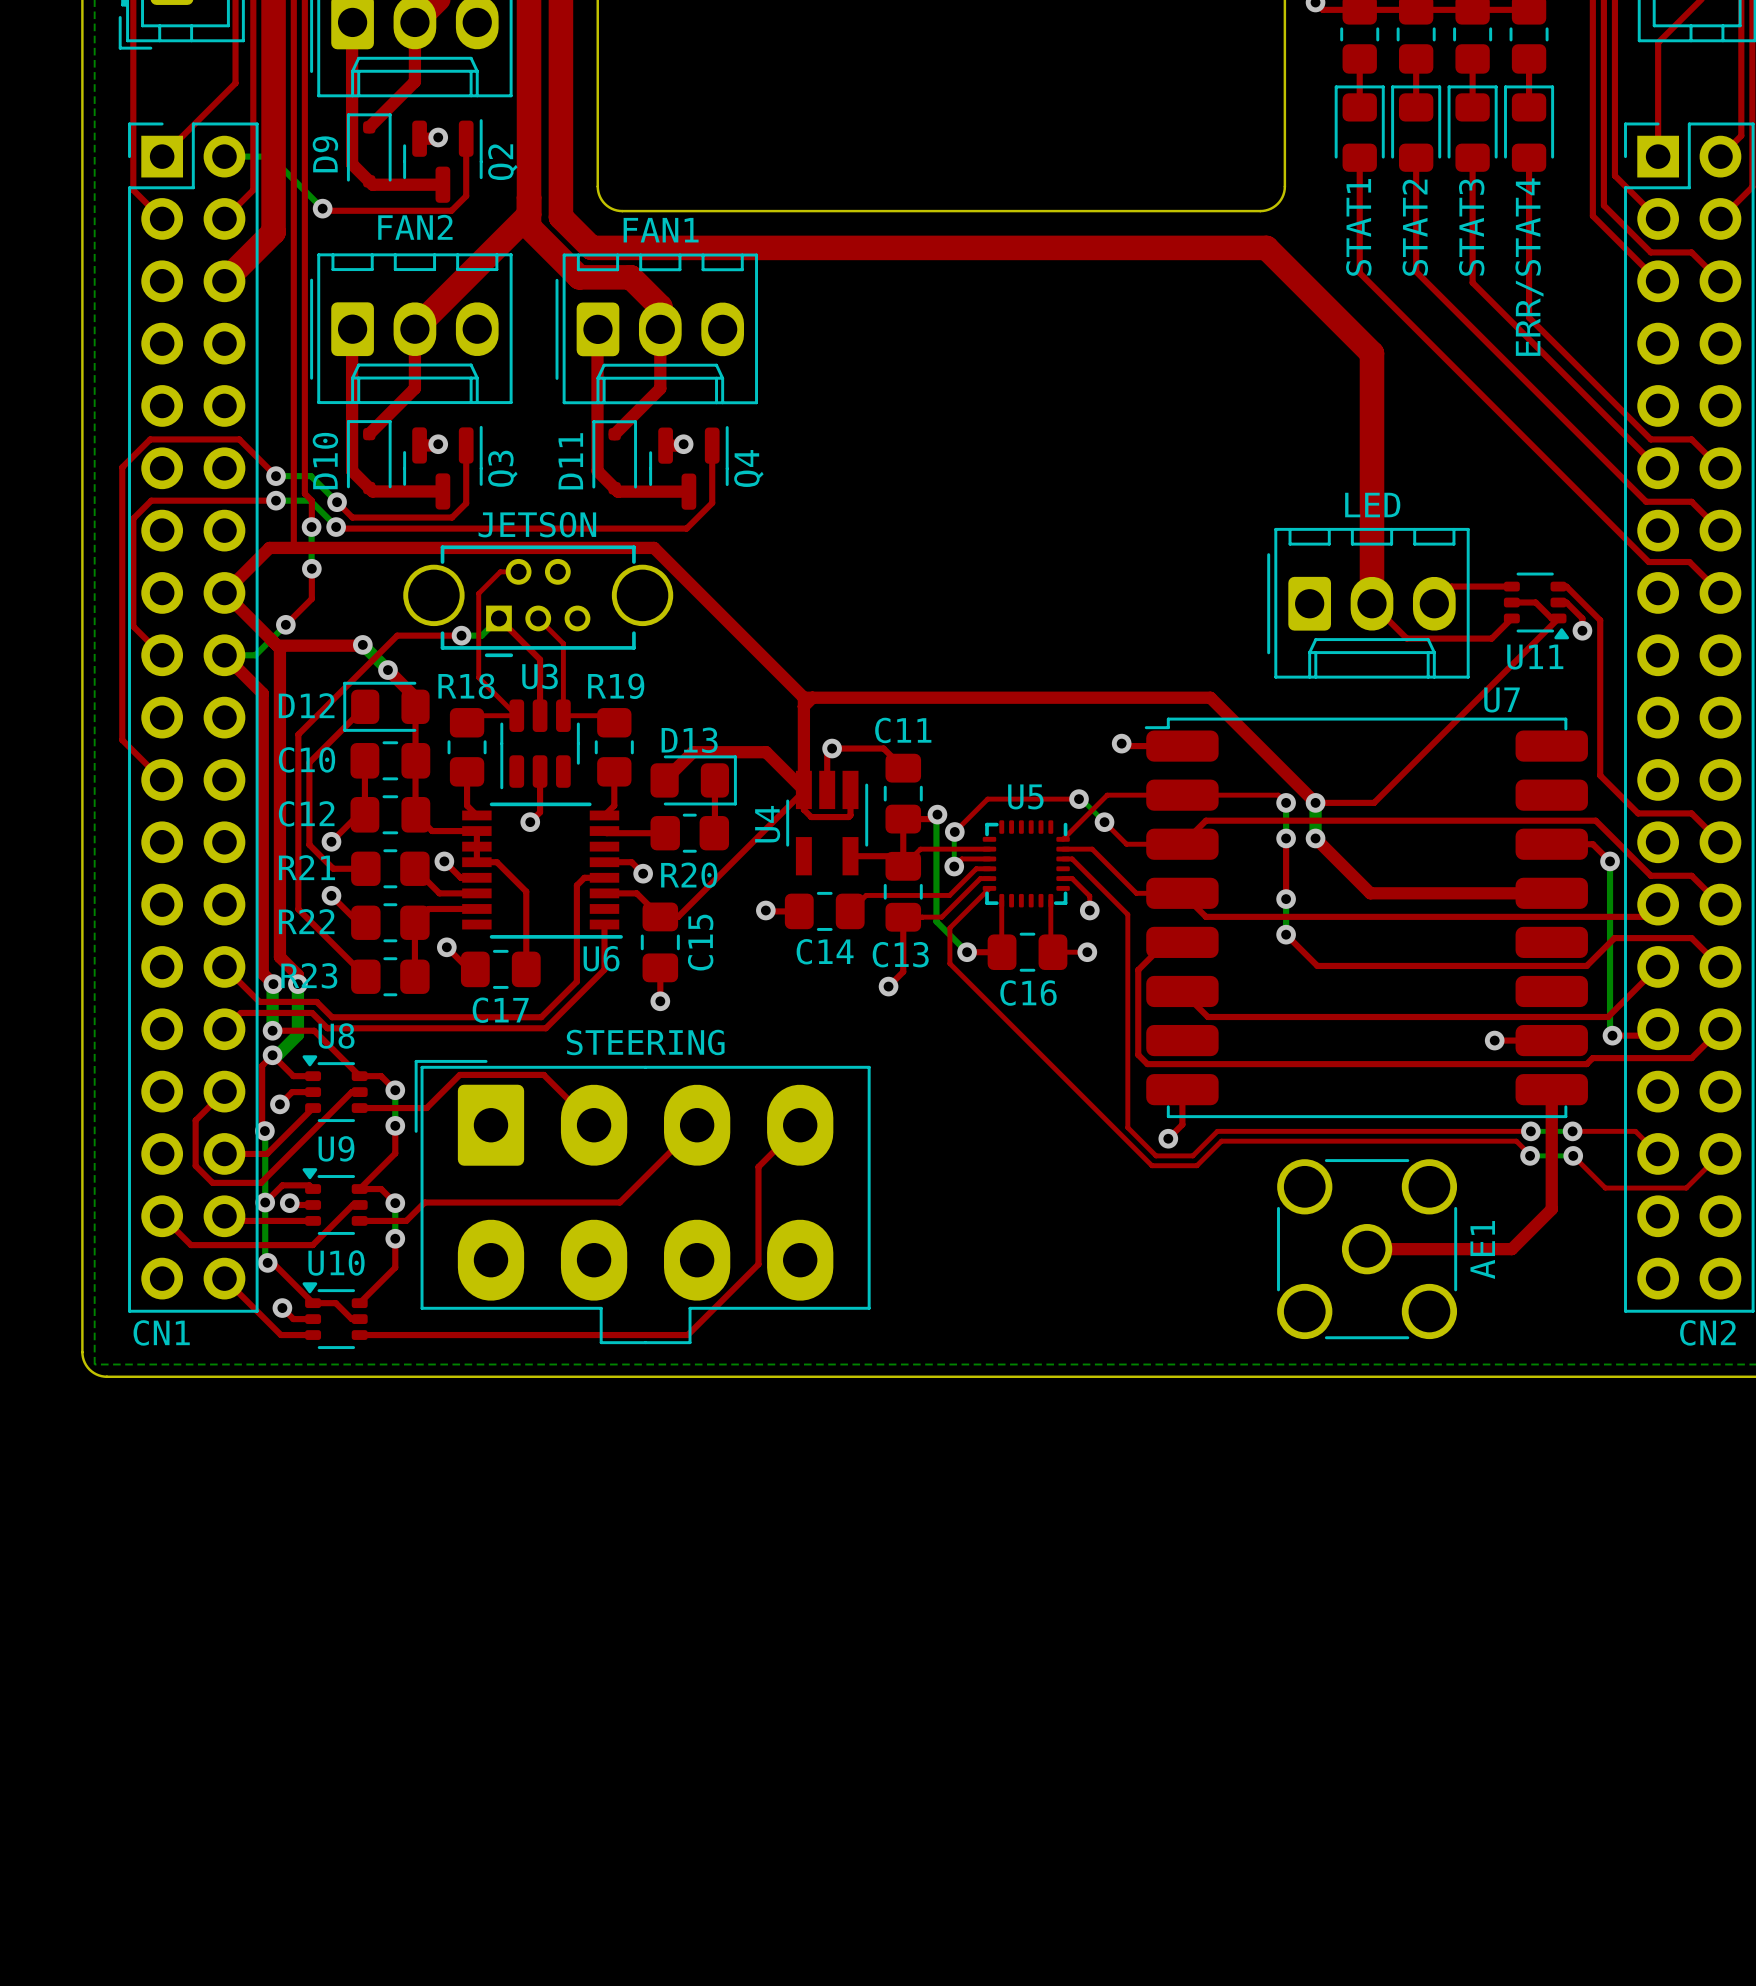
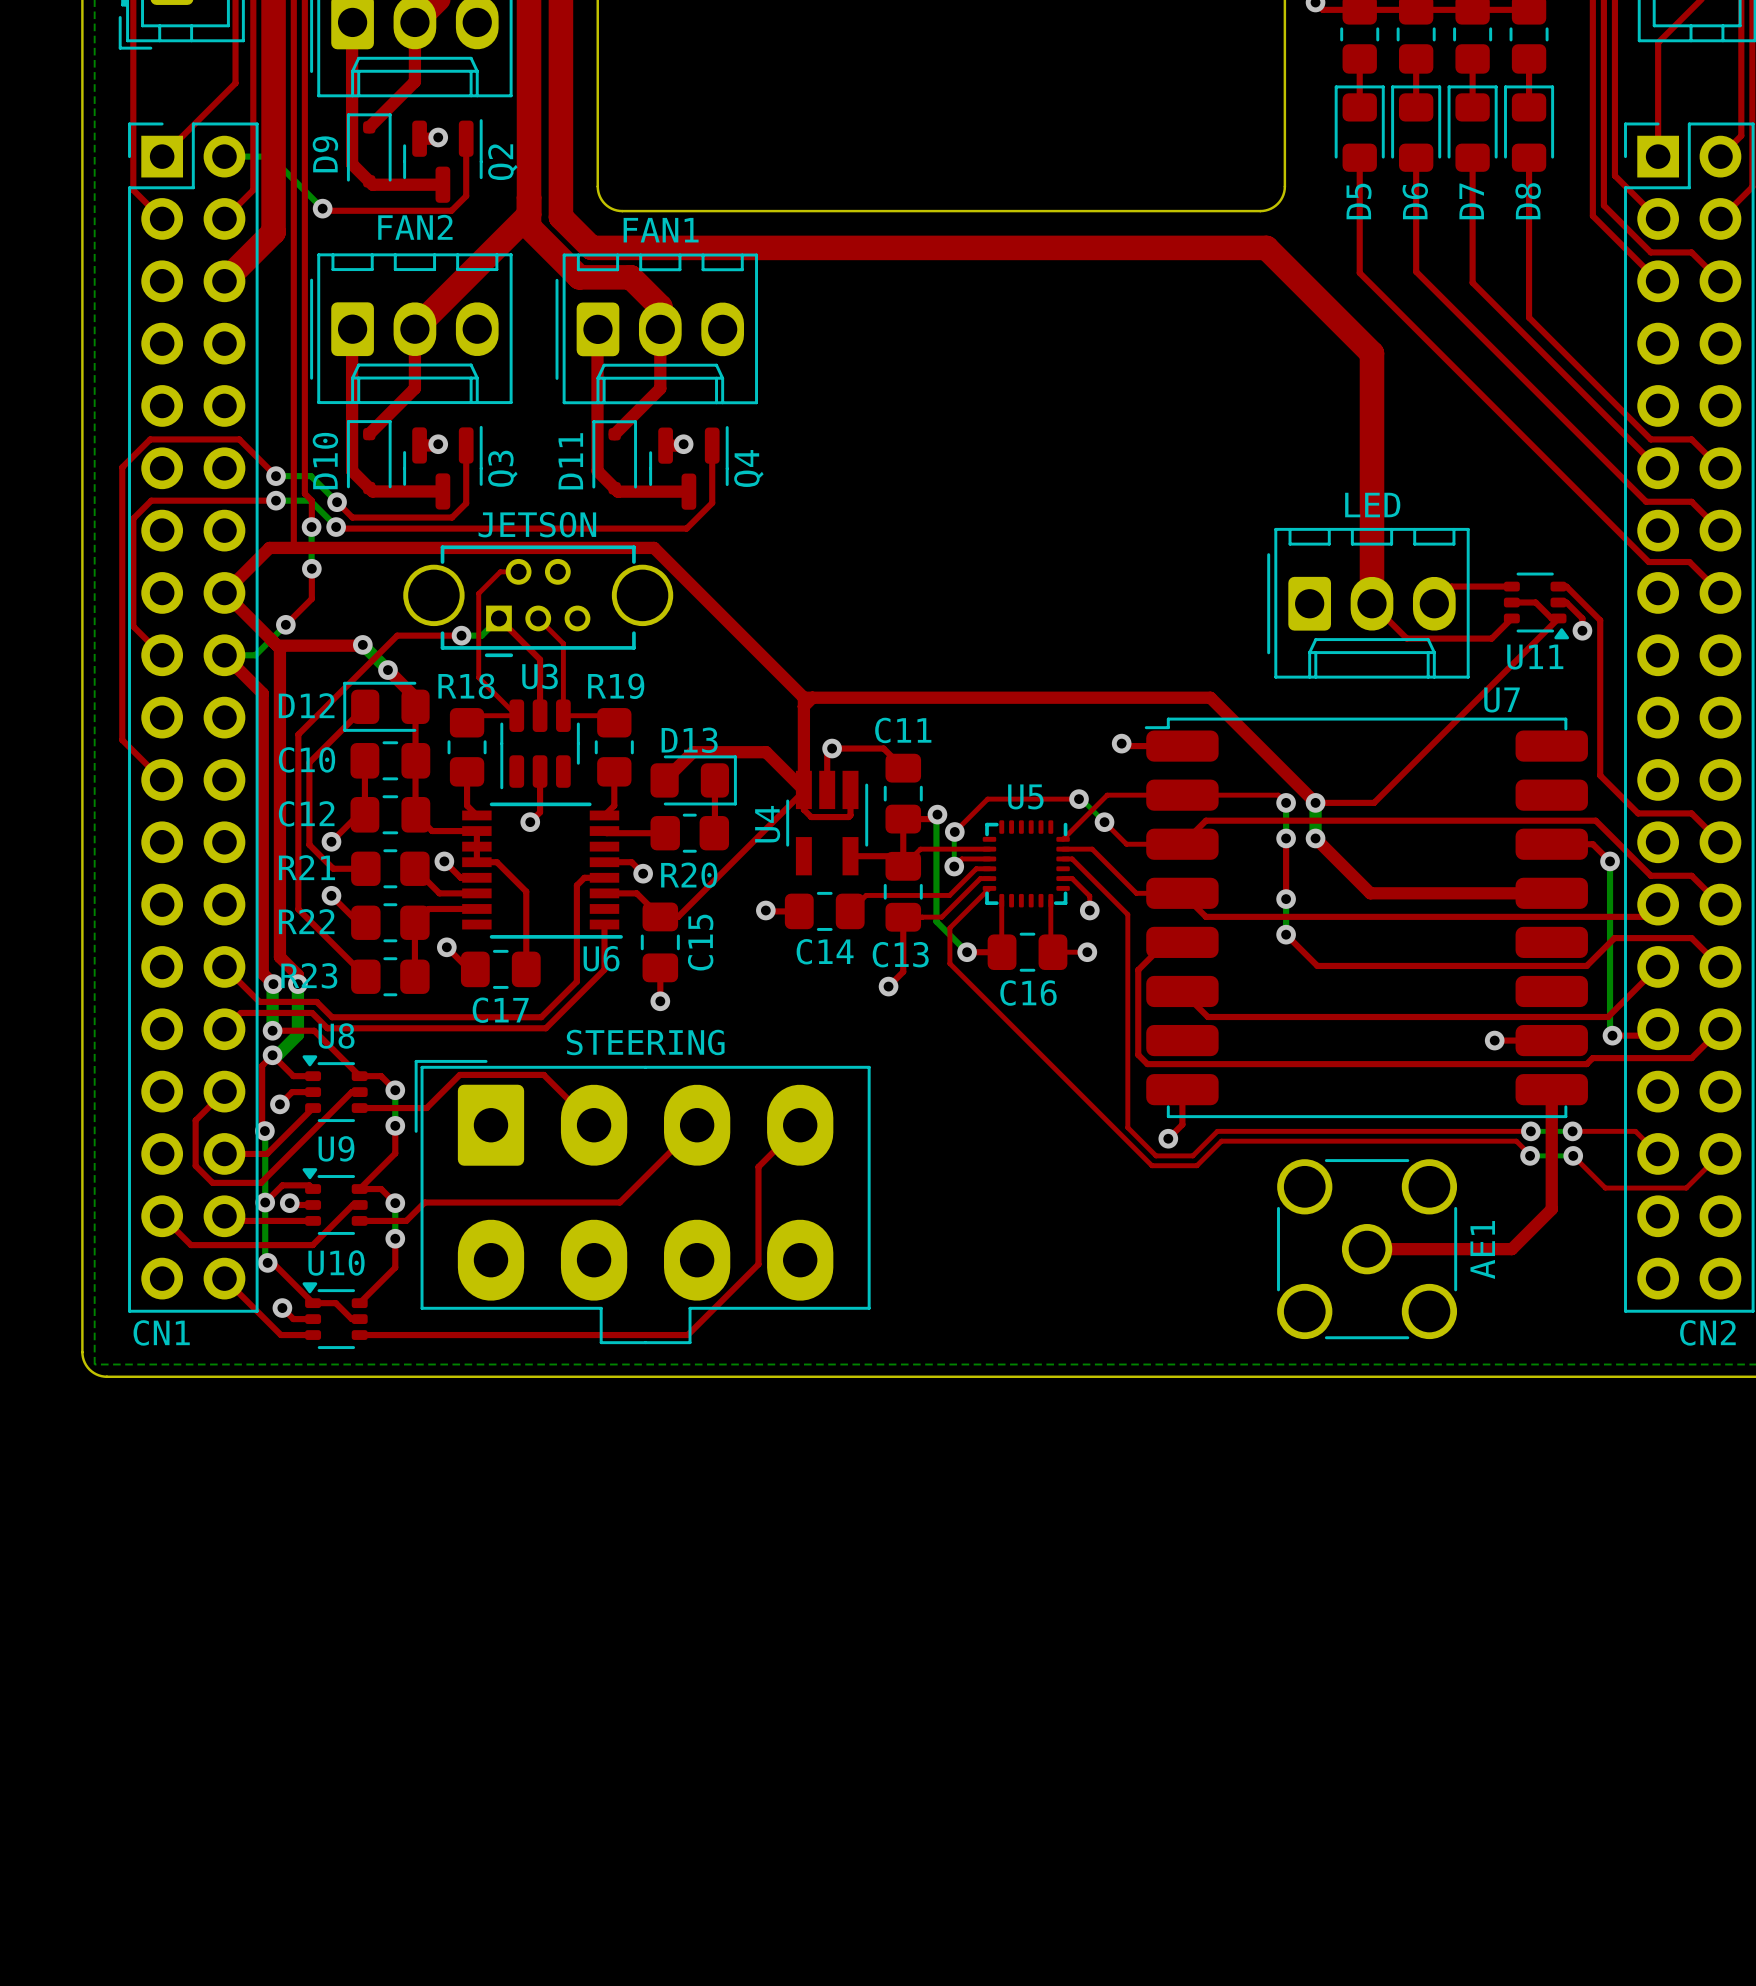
D5 name: none -> D5 (1359, 201)
D6 name: none -> D6 (1415, 201)
D7 name: none -> D7 (1471, 201)
D8 name: none -> D8 (1528, 201)
text: STAT1 (1358, 227) -> none
text: STAT2 (1415, 227) -> none
text: STAT3 (1471, 227) -> none
text: ERR/STAT4 (1529, 267) -> none

